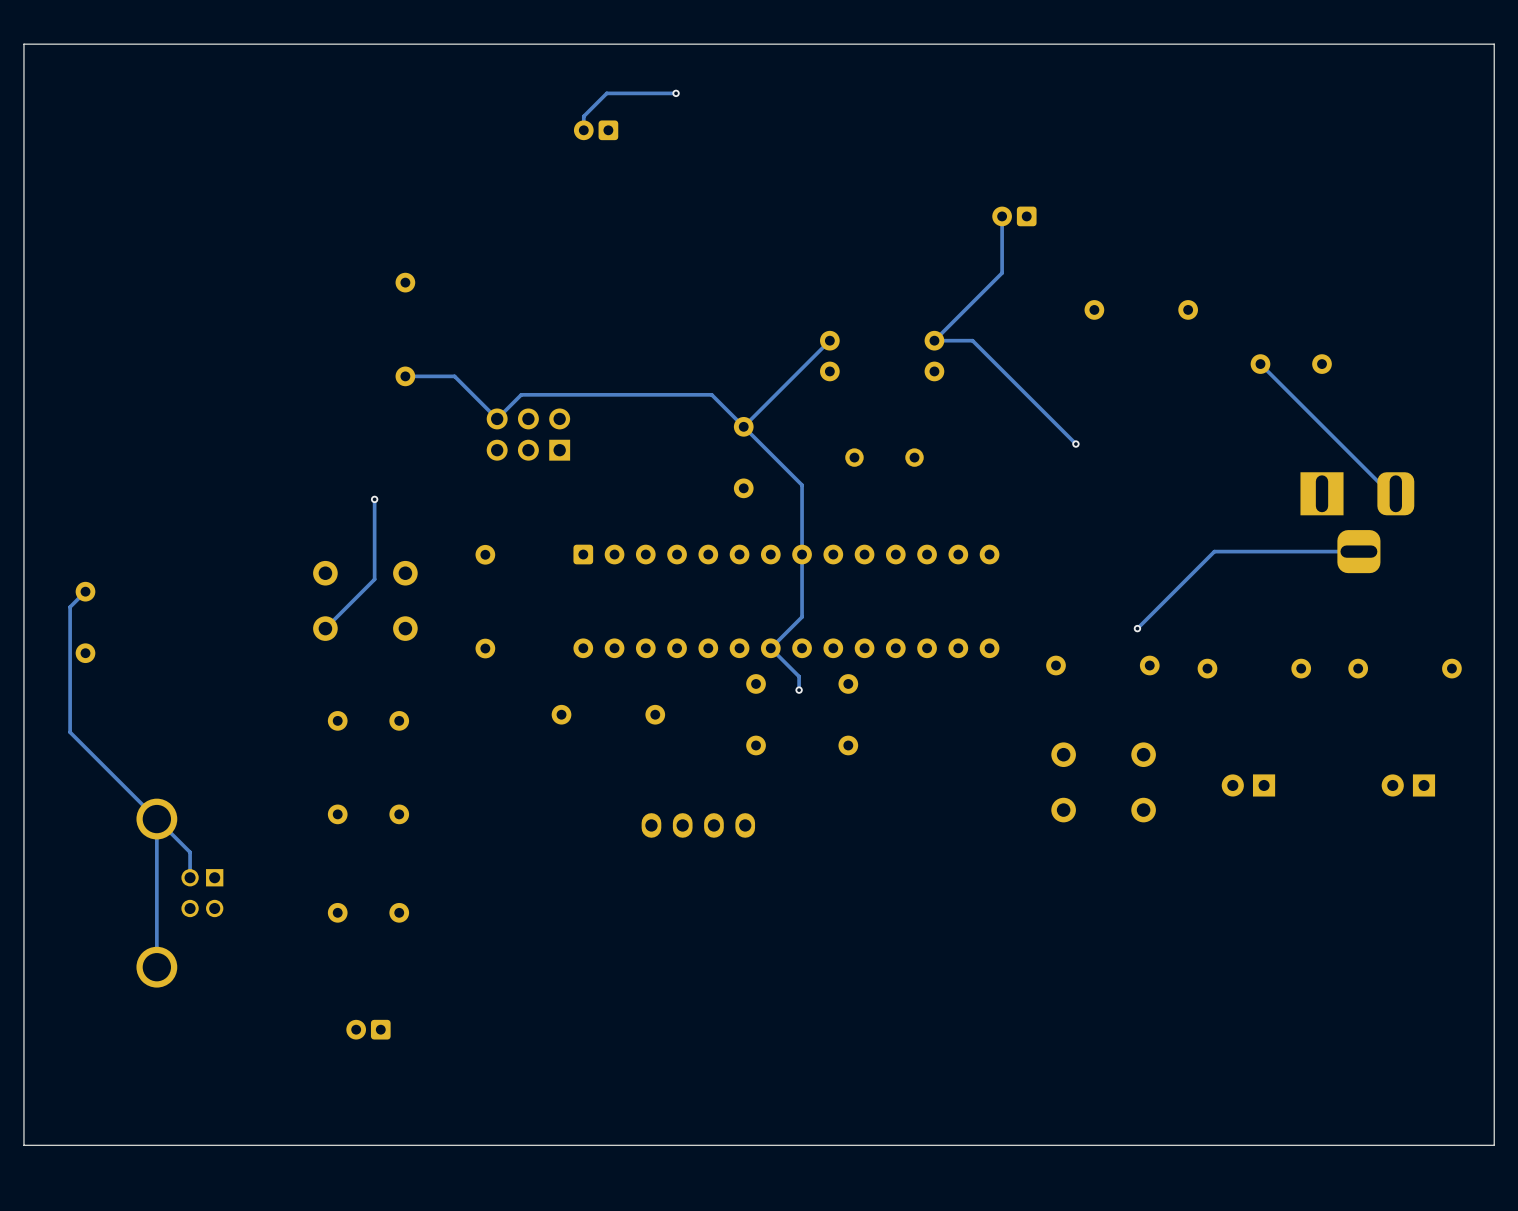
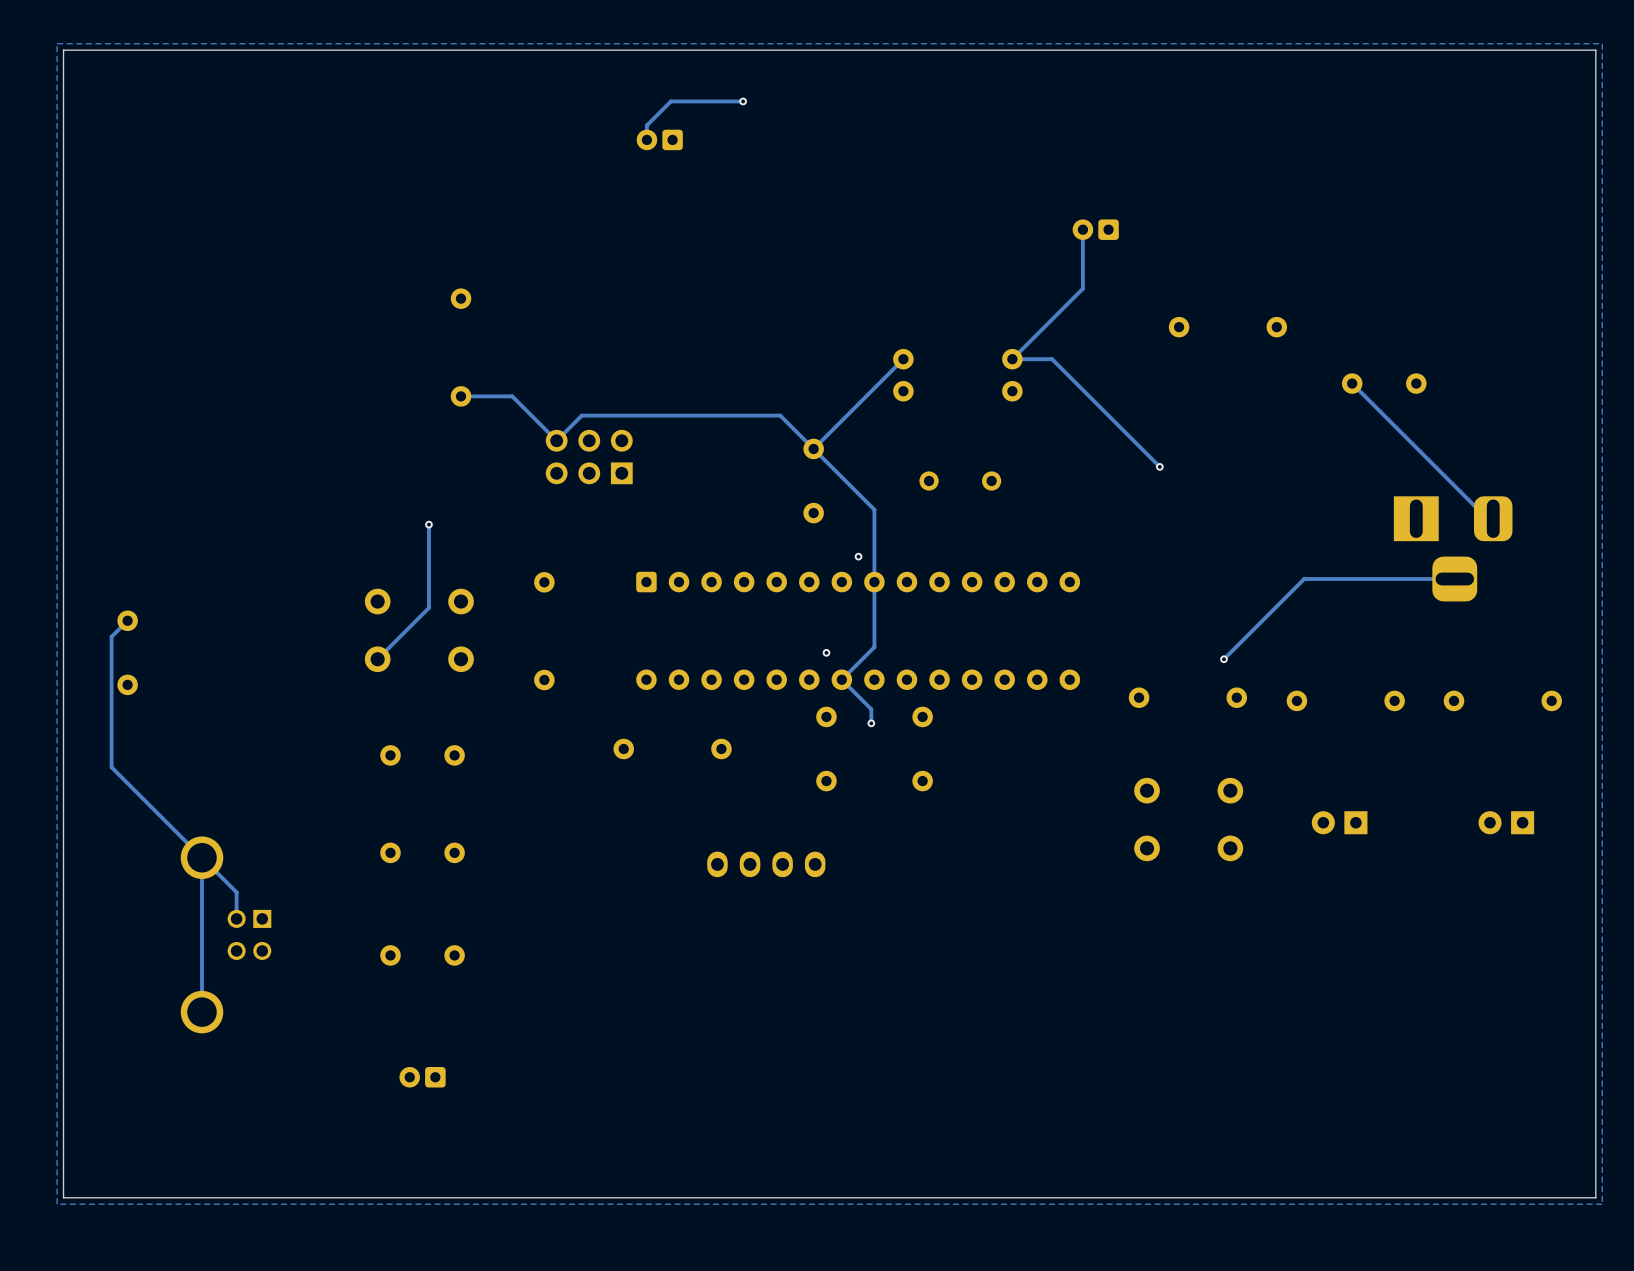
zone outline: none -> (1602, 43) (1602, 1204) (57, 1204) (57, 43) (1602, 43)
via: none -> (858, 556)
via: none -> (826, 652)

